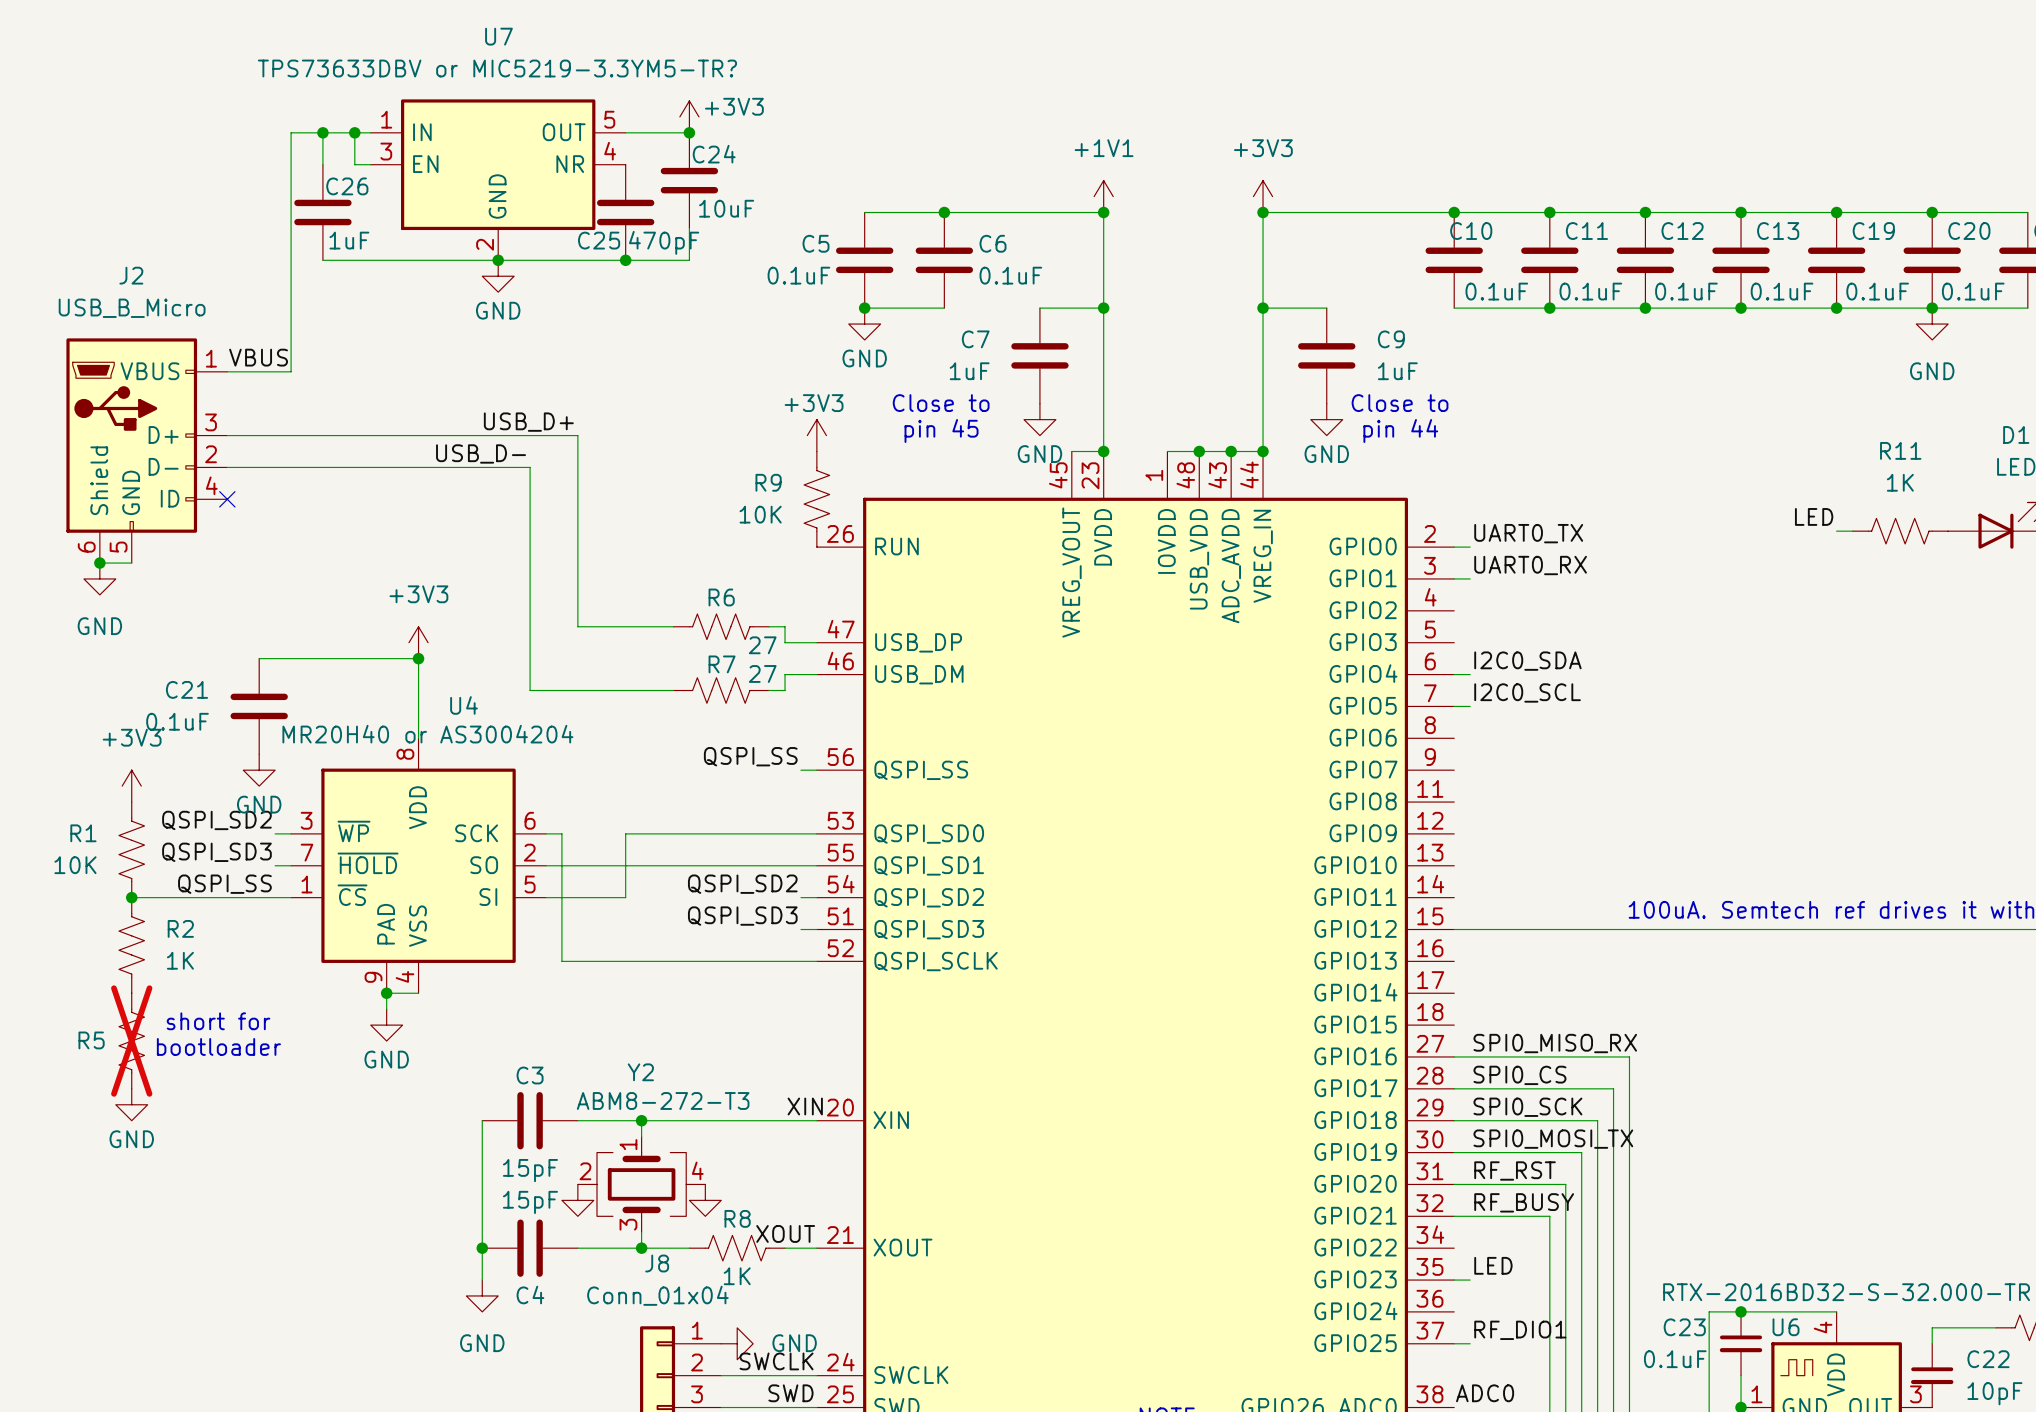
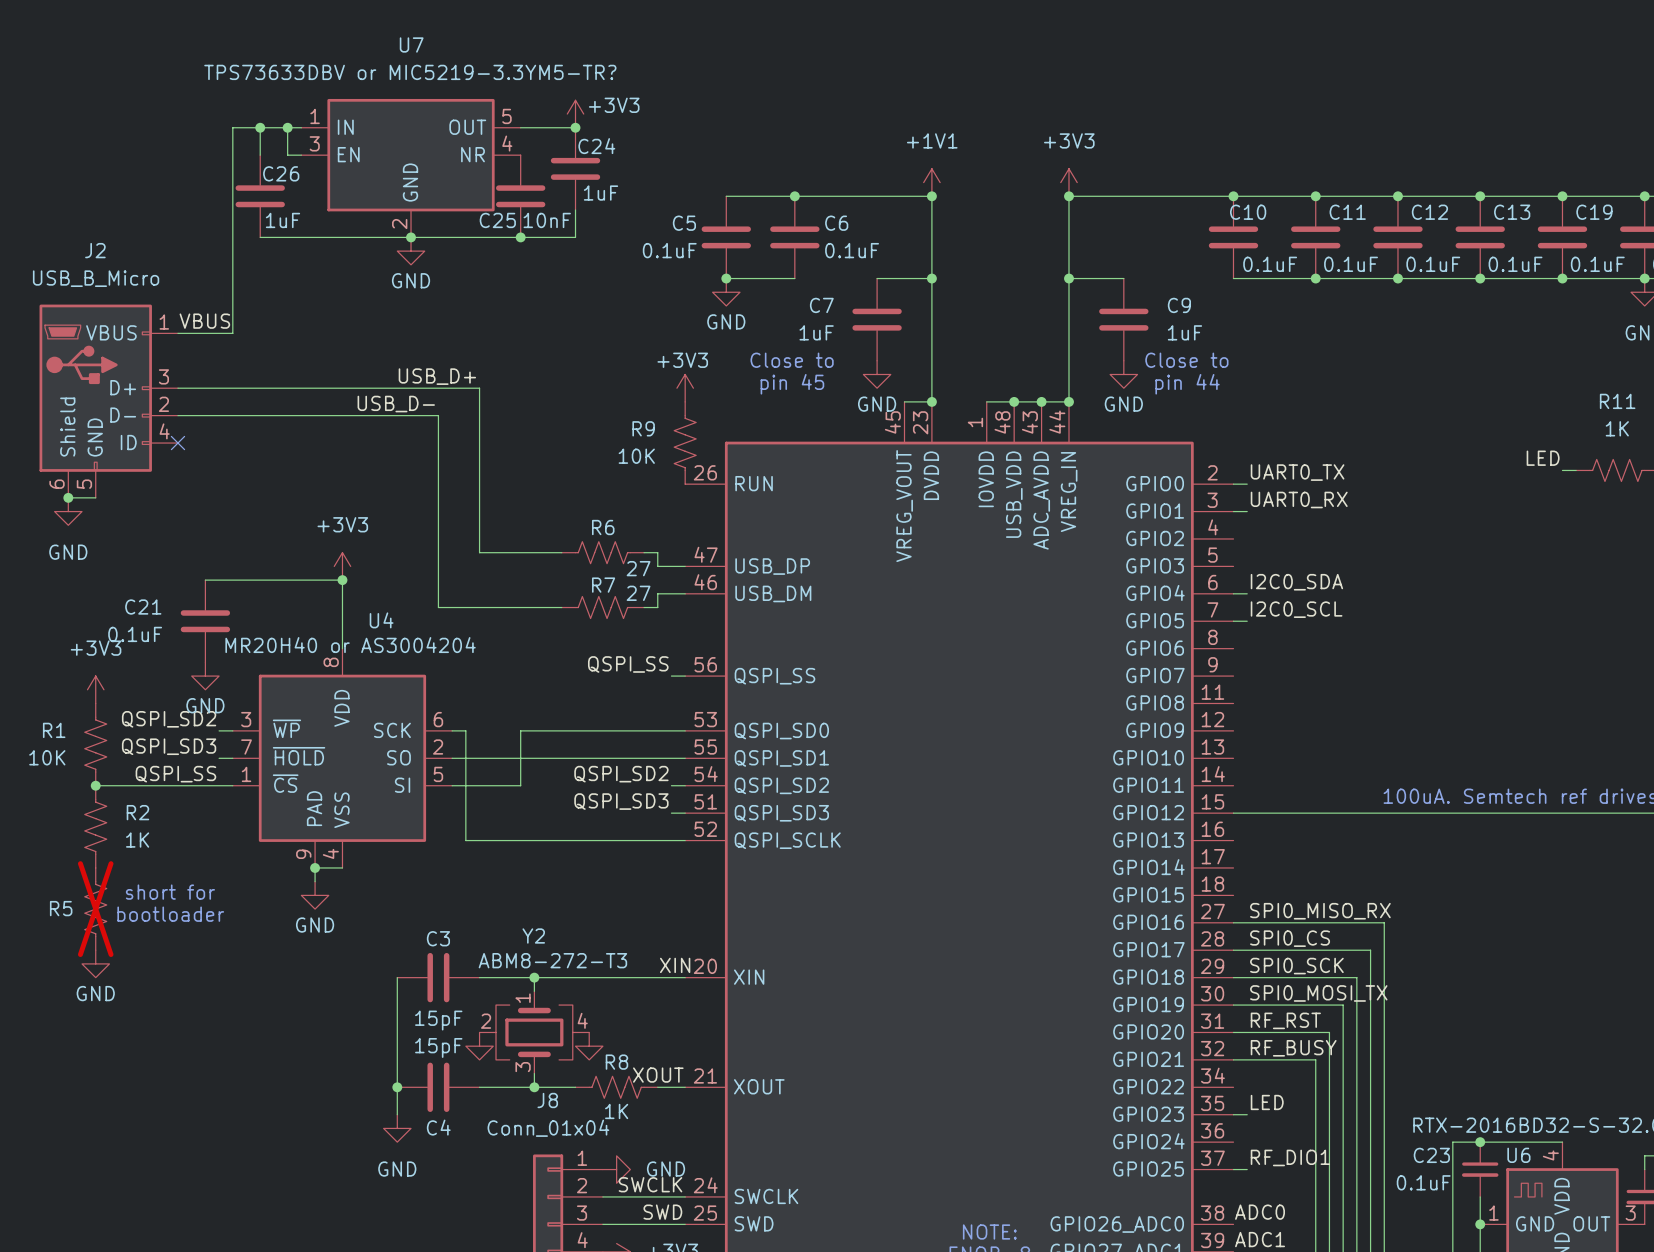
C24 value: 10uF (726, 208) -> 1uF (601, 193)
C25 value: 470pF (664, 242) -> 10nF (547, 220)

